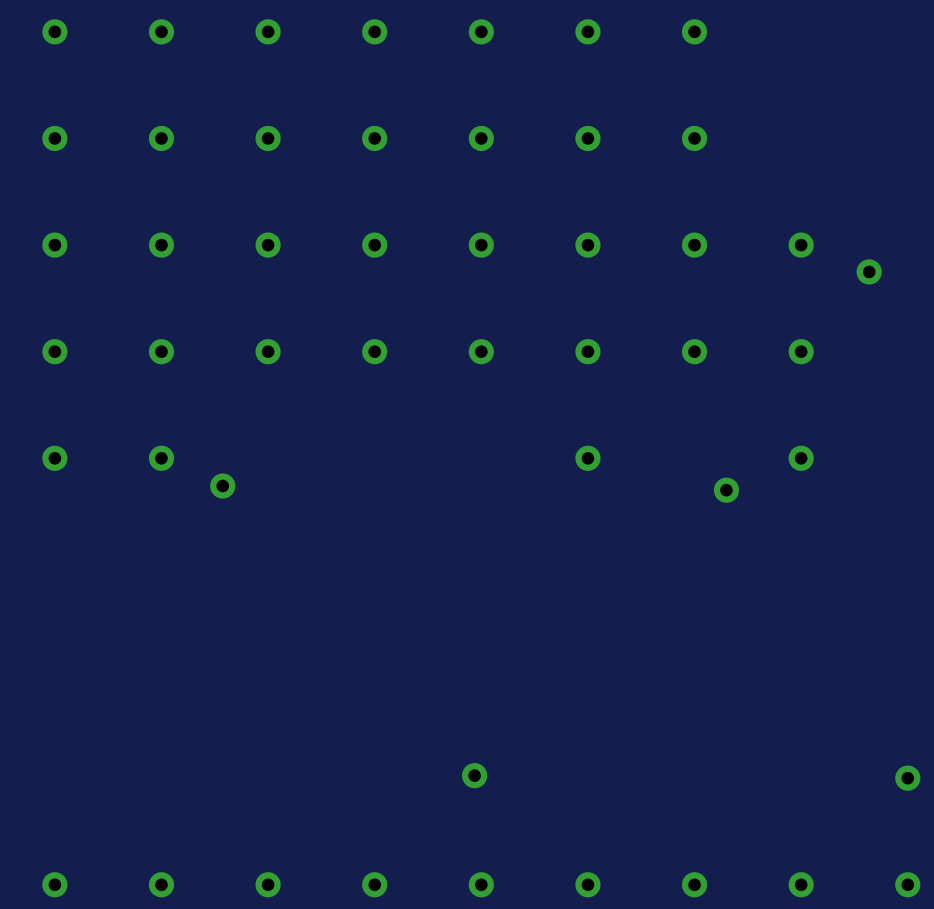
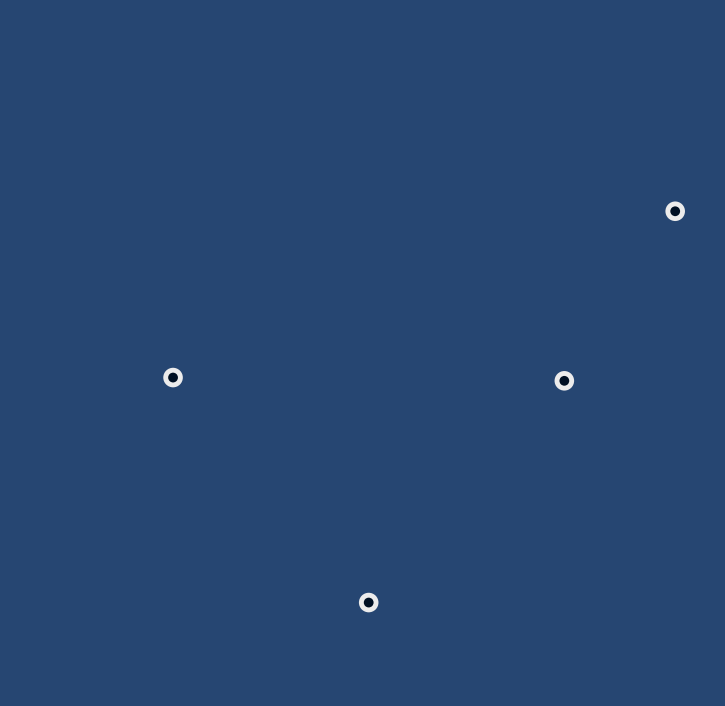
via: (54, 31) -> none
via: (161, 31) -> none
via: (268, 31) -> none
via: (374, 31) -> none
via: (481, 31) -> none
via: (587, 31) -> none
via: (694, 31) -> none
via: (54, 138) -> none
via: (161, 138) -> none
via: (268, 138) -> none
via: (374, 138) -> none
via: (481, 138) -> none
via: (587, 138) -> none
via: (694, 138) -> none
via: (54, 245) -> none
via: (161, 245) -> none
via: (268, 245) -> none
via: (374, 245) -> none
via: (481, 245) -> none
via: (587, 245) -> none
via: (694, 245) -> none
via: (801, 245) -> none
via: (54, 351) -> none
via: (161, 351) -> none
via: (268, 351) -> none
via: (374, 351) -> none
via: (481, 351) -> none
via: (587, 351) -> none
via: (694, 351) -> none
via: (801, 351) -> none
via: (54, 458) -> none
via: (161, 458) -> none
via: (587, 458) -> none
via: (801, 458) -> none
via: (907, 778) -> none
via: (54, 884) -> none
via: (161, 884) -> none
via: (268, 884) -> none
via: (374, 884) -> none
via: (481, 884) -> none
via: (587, 884) -> none
via: (694, 884) -> none
via: (801, 884) -> none
via: (907, 884) -> none

